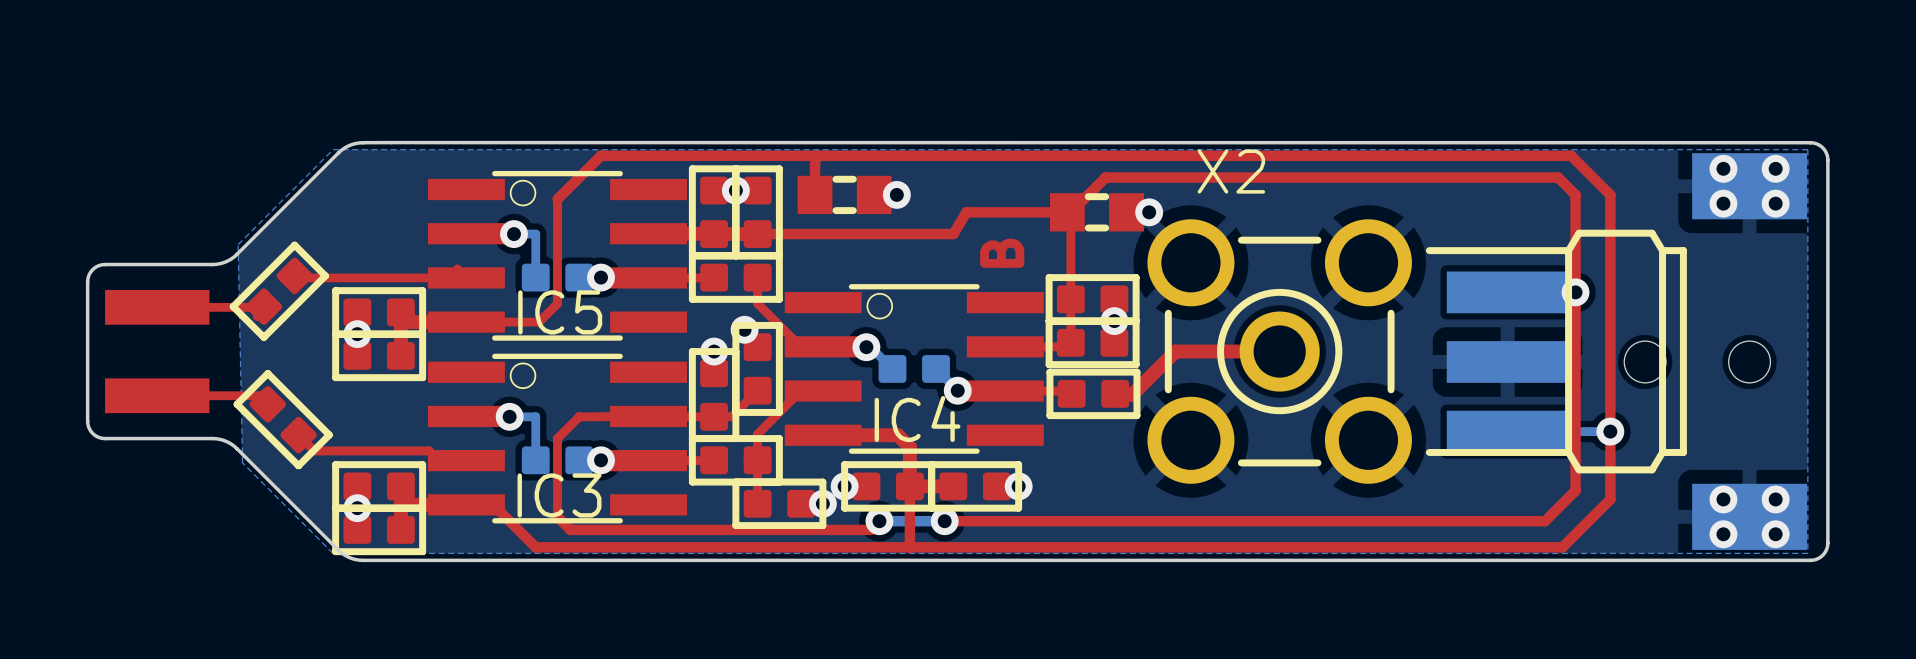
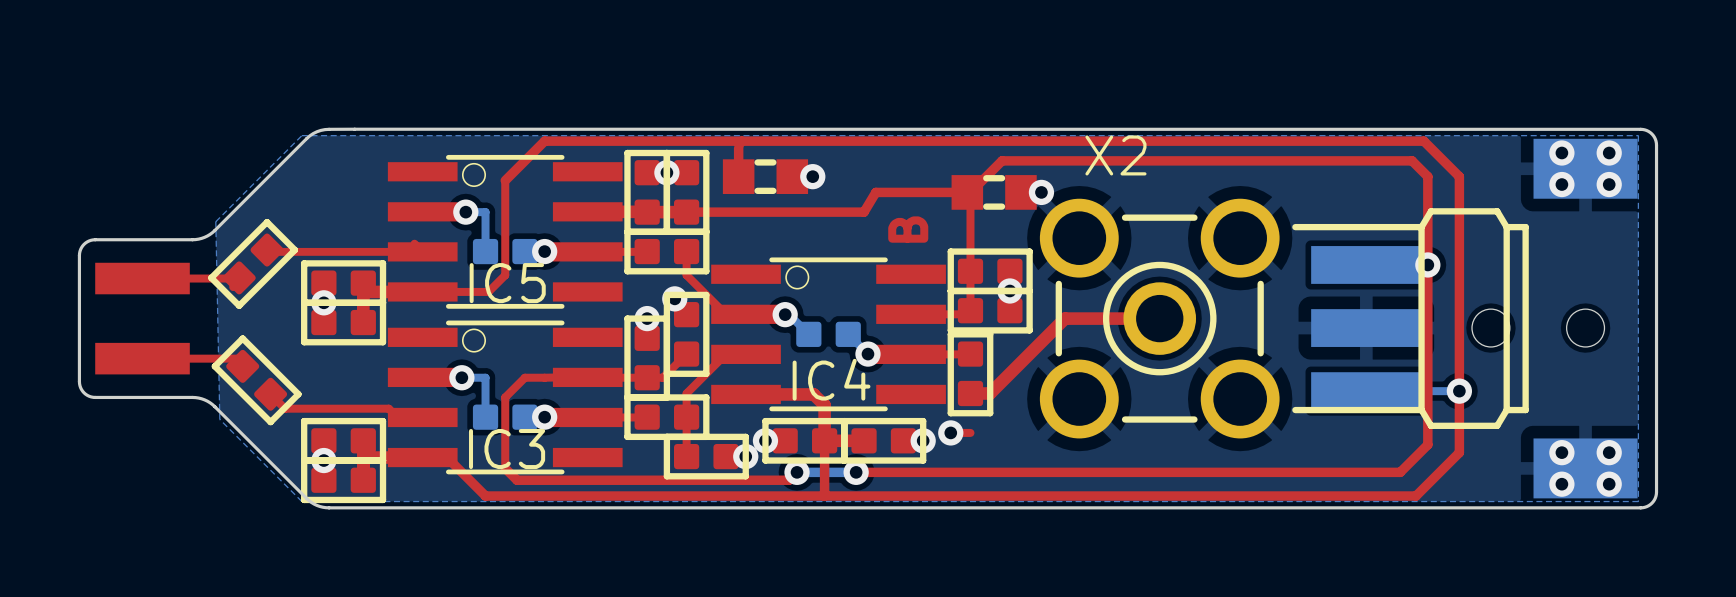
top track: (1175, 351) (1132, 394) (1115, 393) -> (1064, 318) (990, 393) (970, 393)
part rotation: 0° (1093, 393) -> 90° clockwise (970, 373)
top track: none -> (950, 432) (970, 432)
via: none -> (950, 432)

